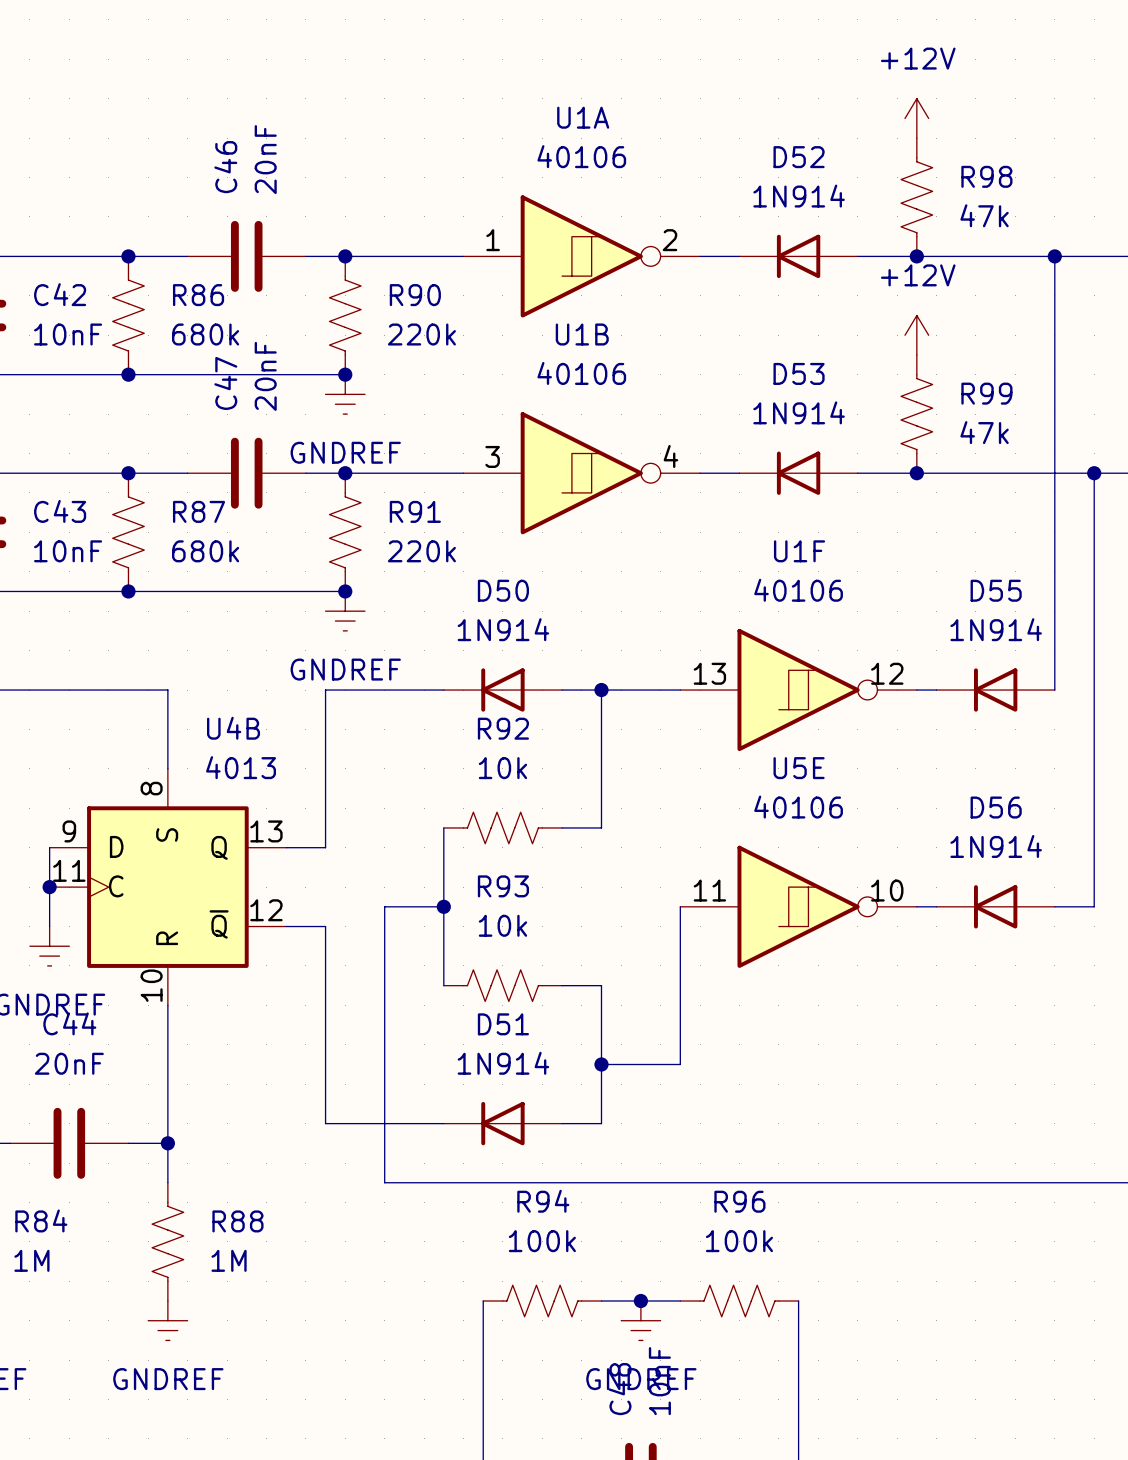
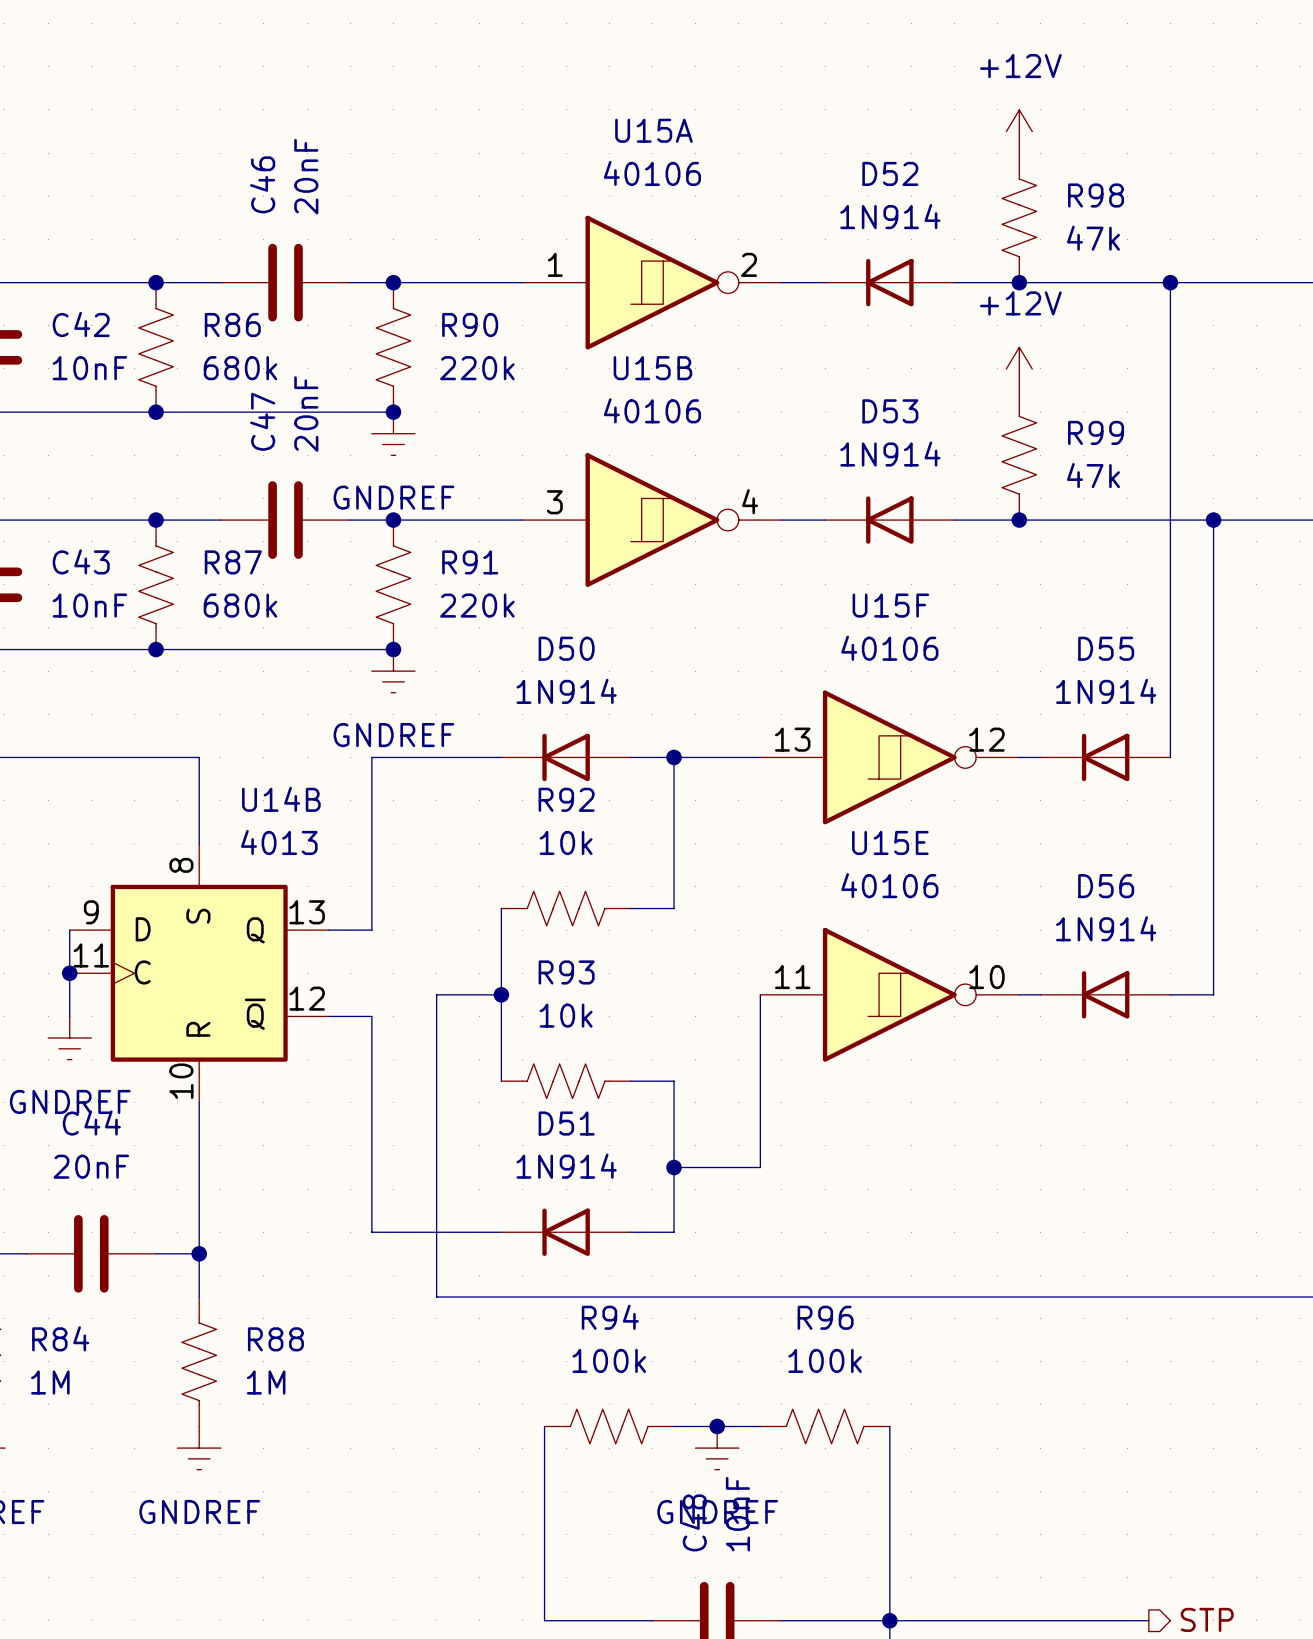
U1A name: U1A (583, 117) -> U15A (653, 130)
U1B name: U1B (582, 334) -> U15B (652, 368)
U1F name: U1F (799, 551) -> U15F (890, 605)
U4B name: U4B (233, 728) -> U14B (281, 799)
U5E name: U5E (799, 768) -> U15E (890, 842)

